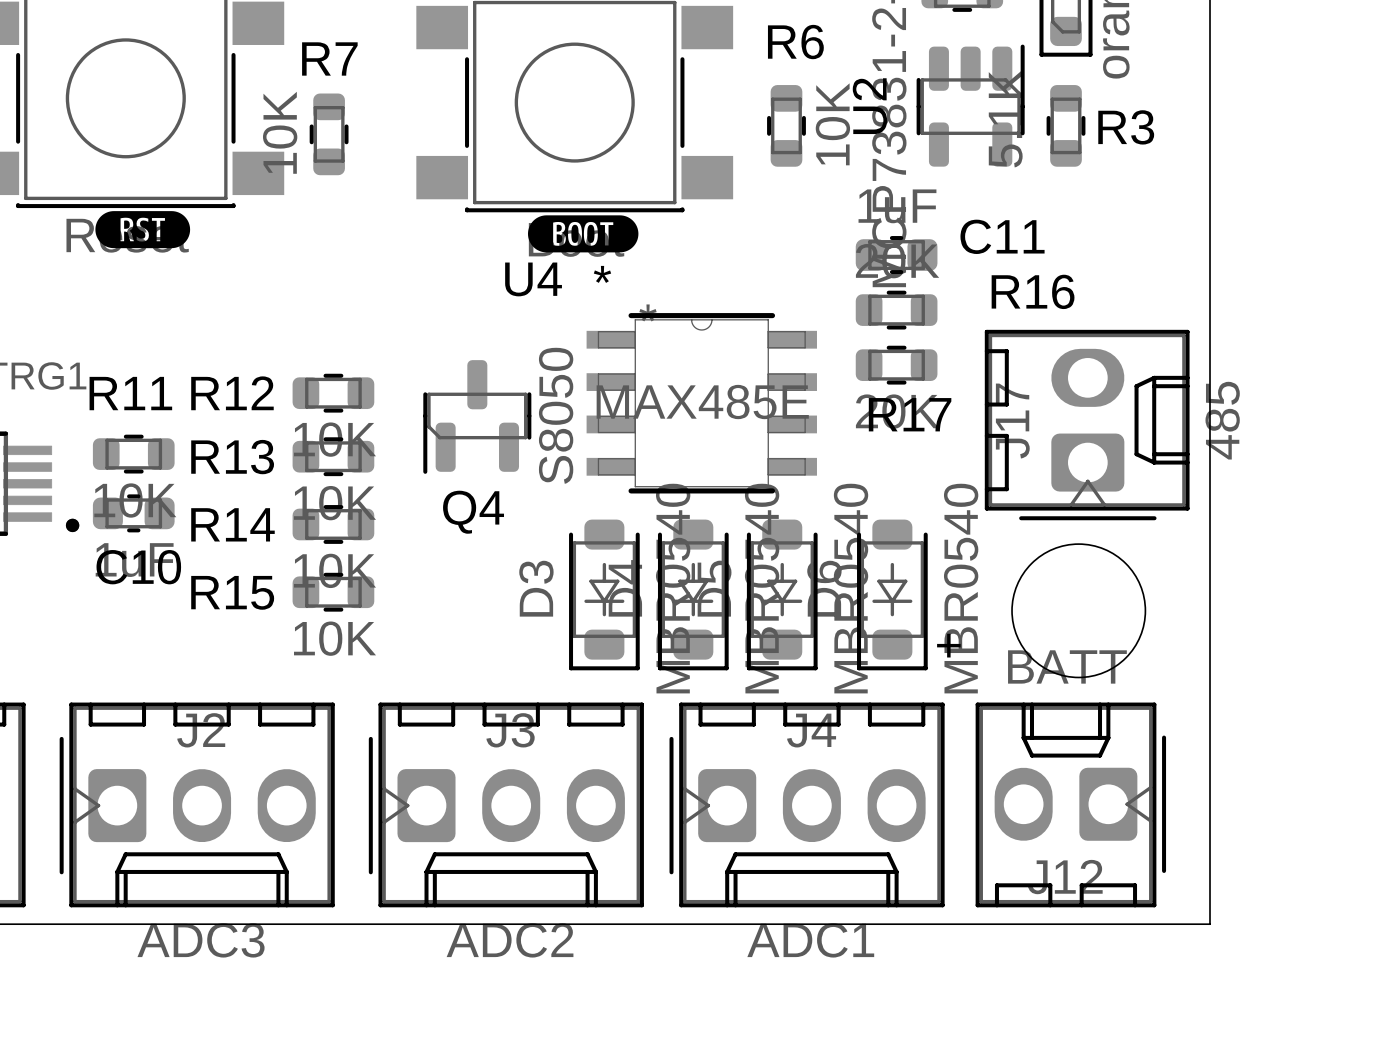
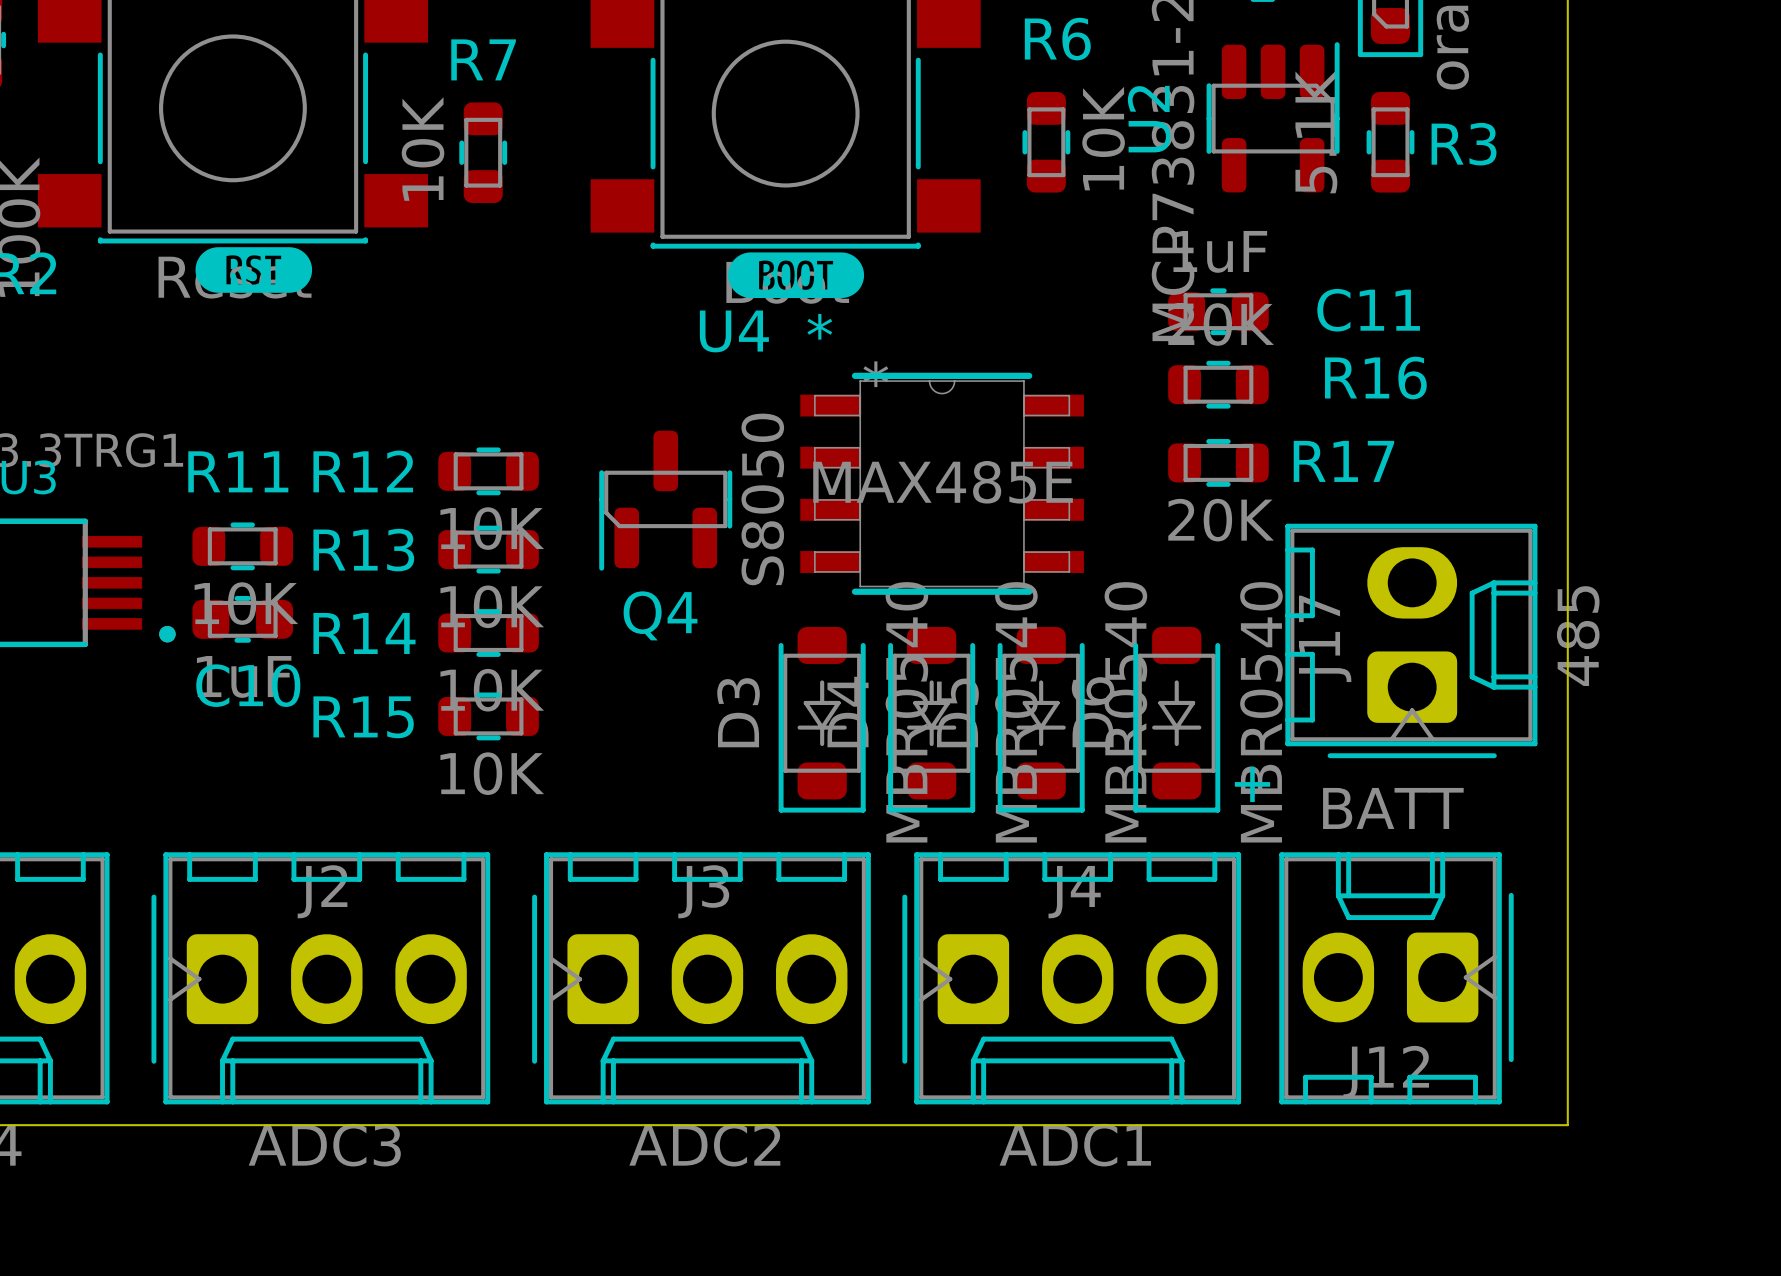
C11 name position: C11 (1002, 236) -> C11 (1368, 310)
C11 position: (896, 255) -> (1218, 311)
R16 name position: R16 (1033, 291) -> R16 (1375, 378)
R16 position: (896, 310) -> (1218, 384)
R17 position: (896, 365) -> (1218, 462)
R17 name position: R17 (910, 414) -> R17 (1343, 461)
J17 position: (1087, 425) -> (1411, 640)
round board edge: [1011, 543, 1147, 679] -> none

